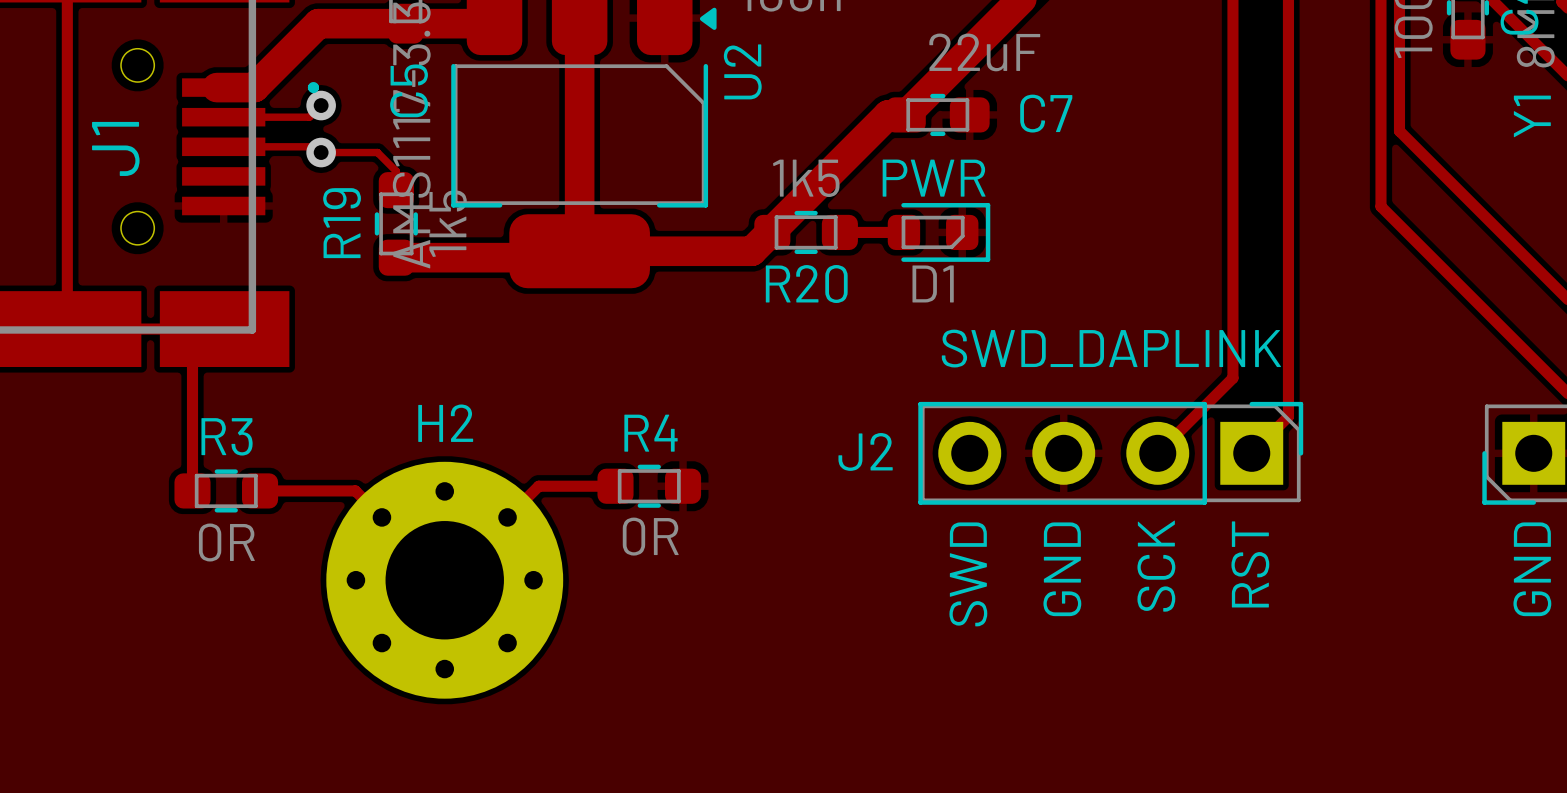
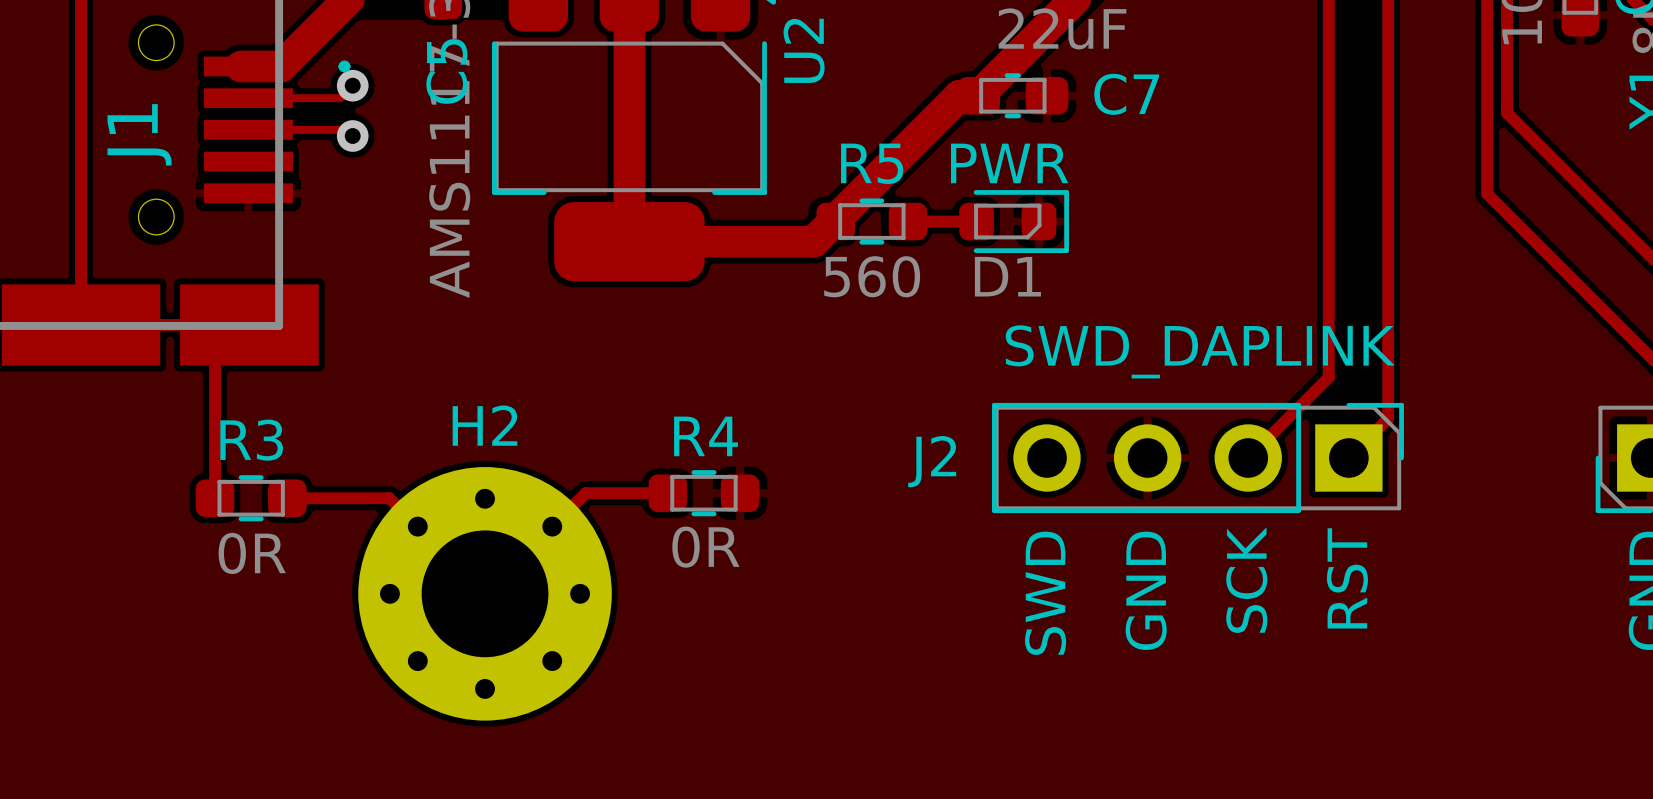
track: (321, 152) (377, 152) (396, 171) (396, 190) -> none
R20 value: 1k5 (806, 178) -> 560 (872, 276)
R19: 1k5 (396, 223) -> none
track: (579, 251) (573, 257) (396, 257) -> none
R20 name: R20 (806, 284) -> R5 (872, 163)

